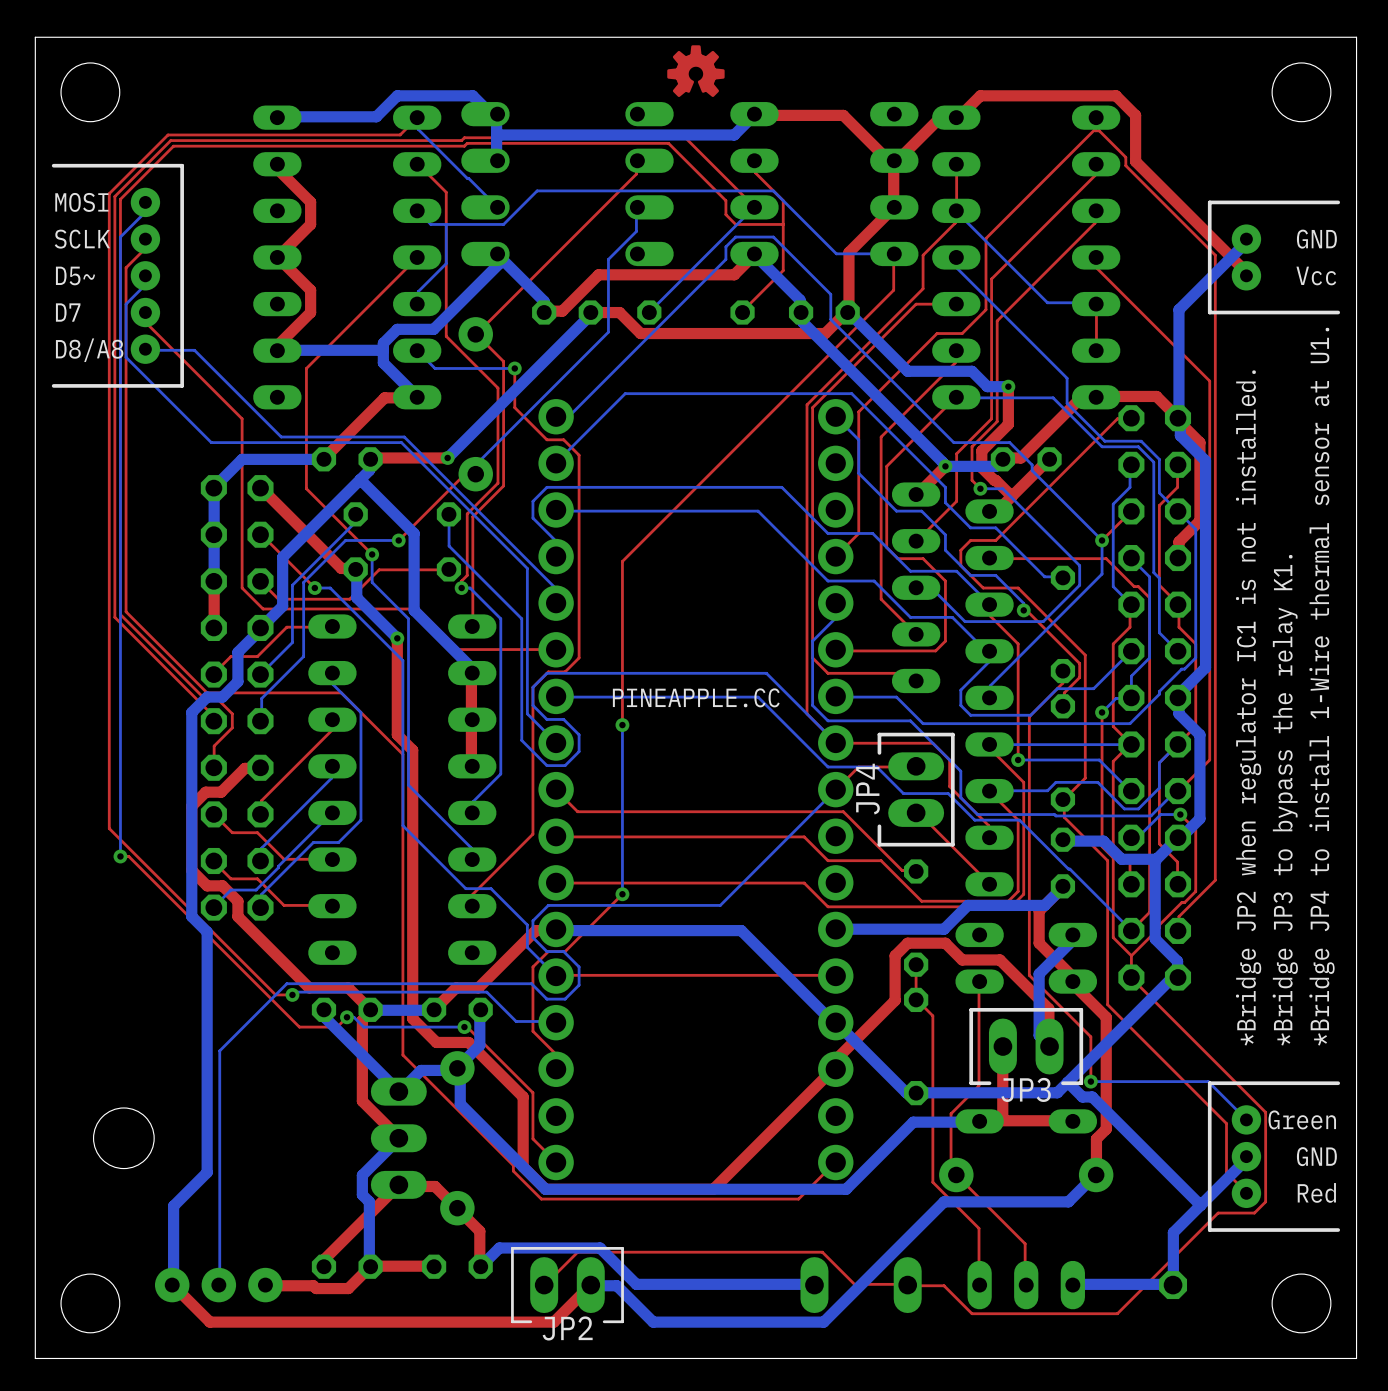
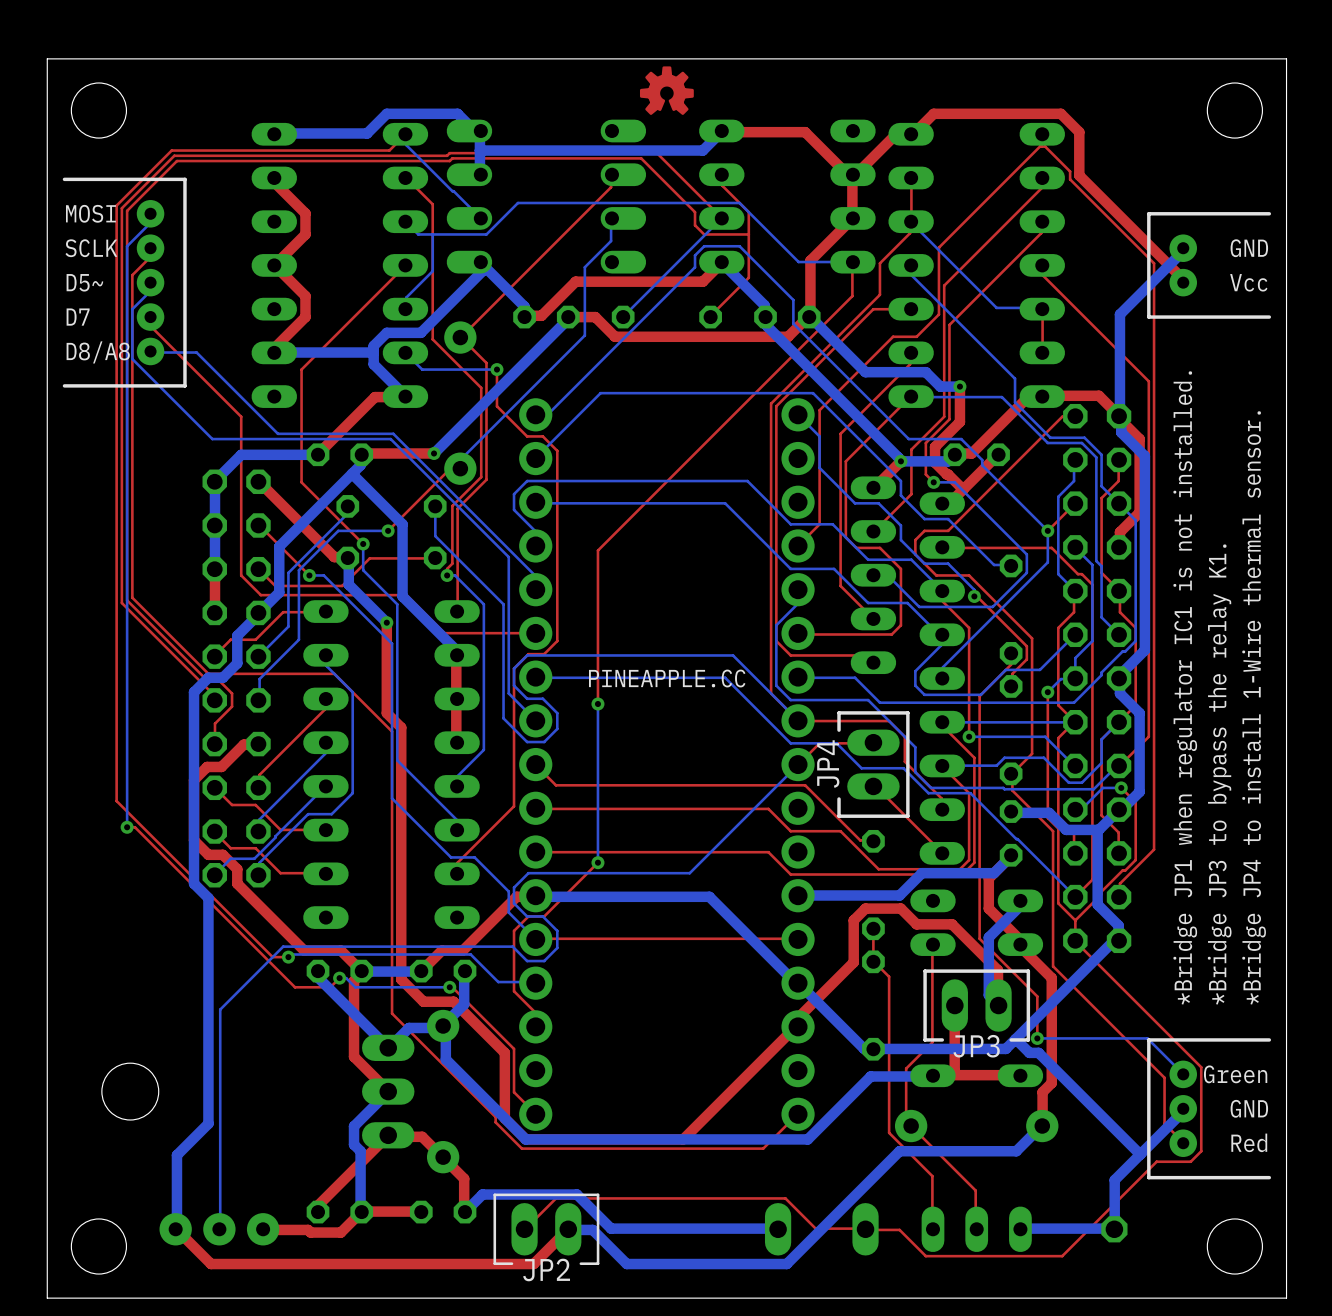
text: *Bridge JP4 to install 1-Wire thermal sensor at U1. (1321, 686) -> *Bridge JP4 to install 1-Wire thermal sensor. (1254, 707)
text: *Bridge JP2 when regulator IC1 is not installed. (1248, 707) -> *Bridge JP1 when regulator IC1 is not installed. (1185, 687)

